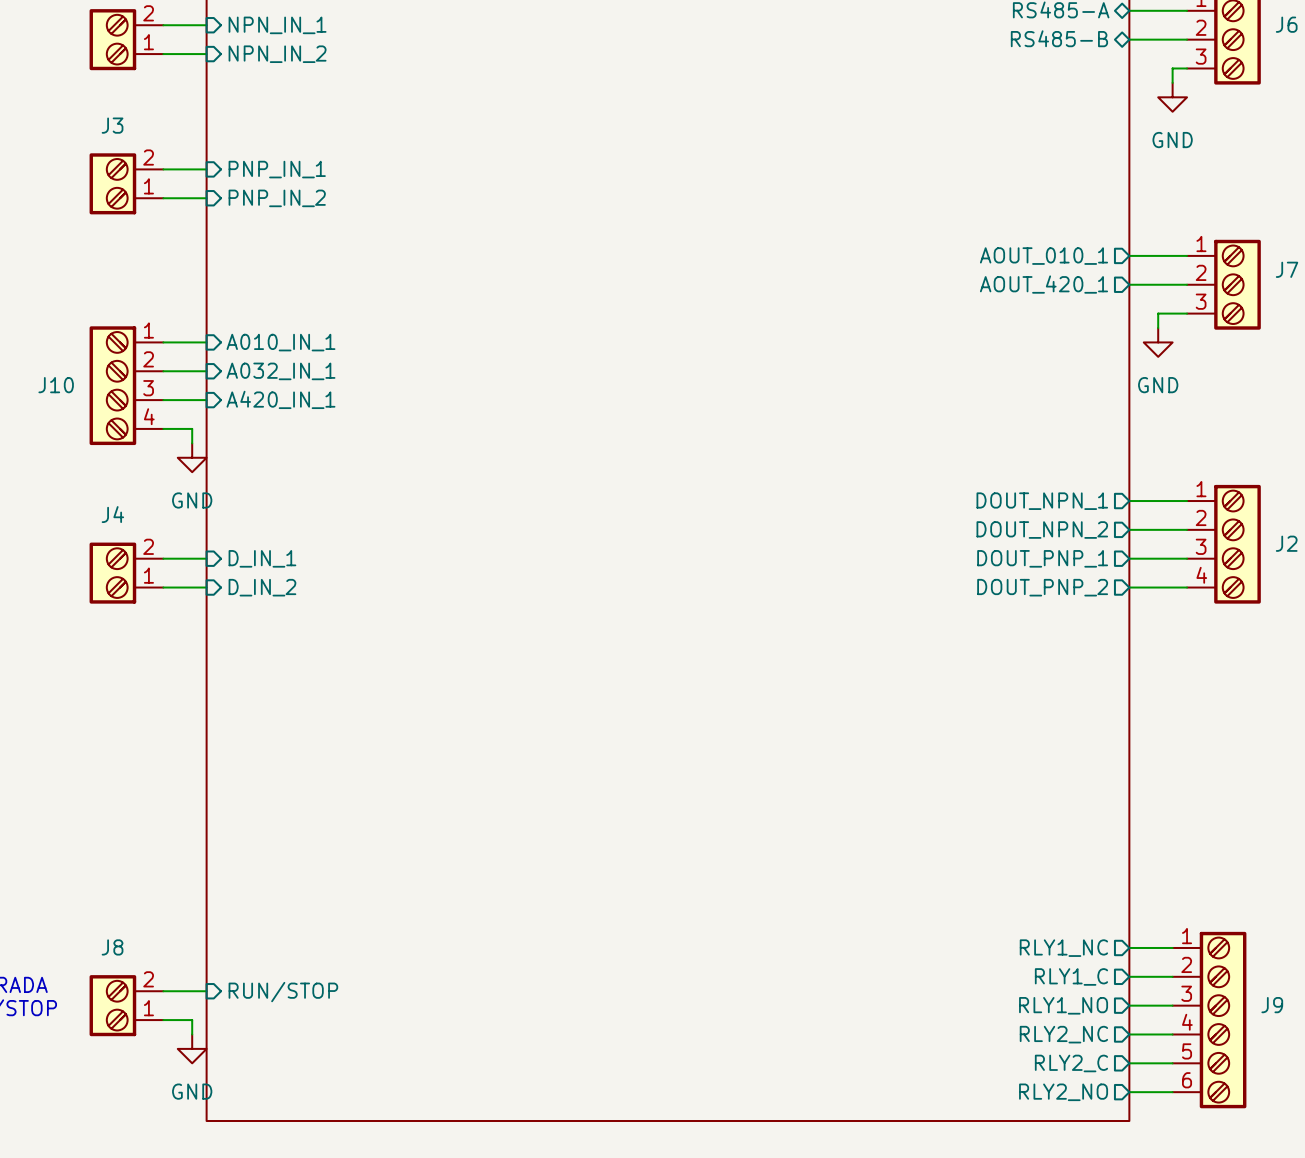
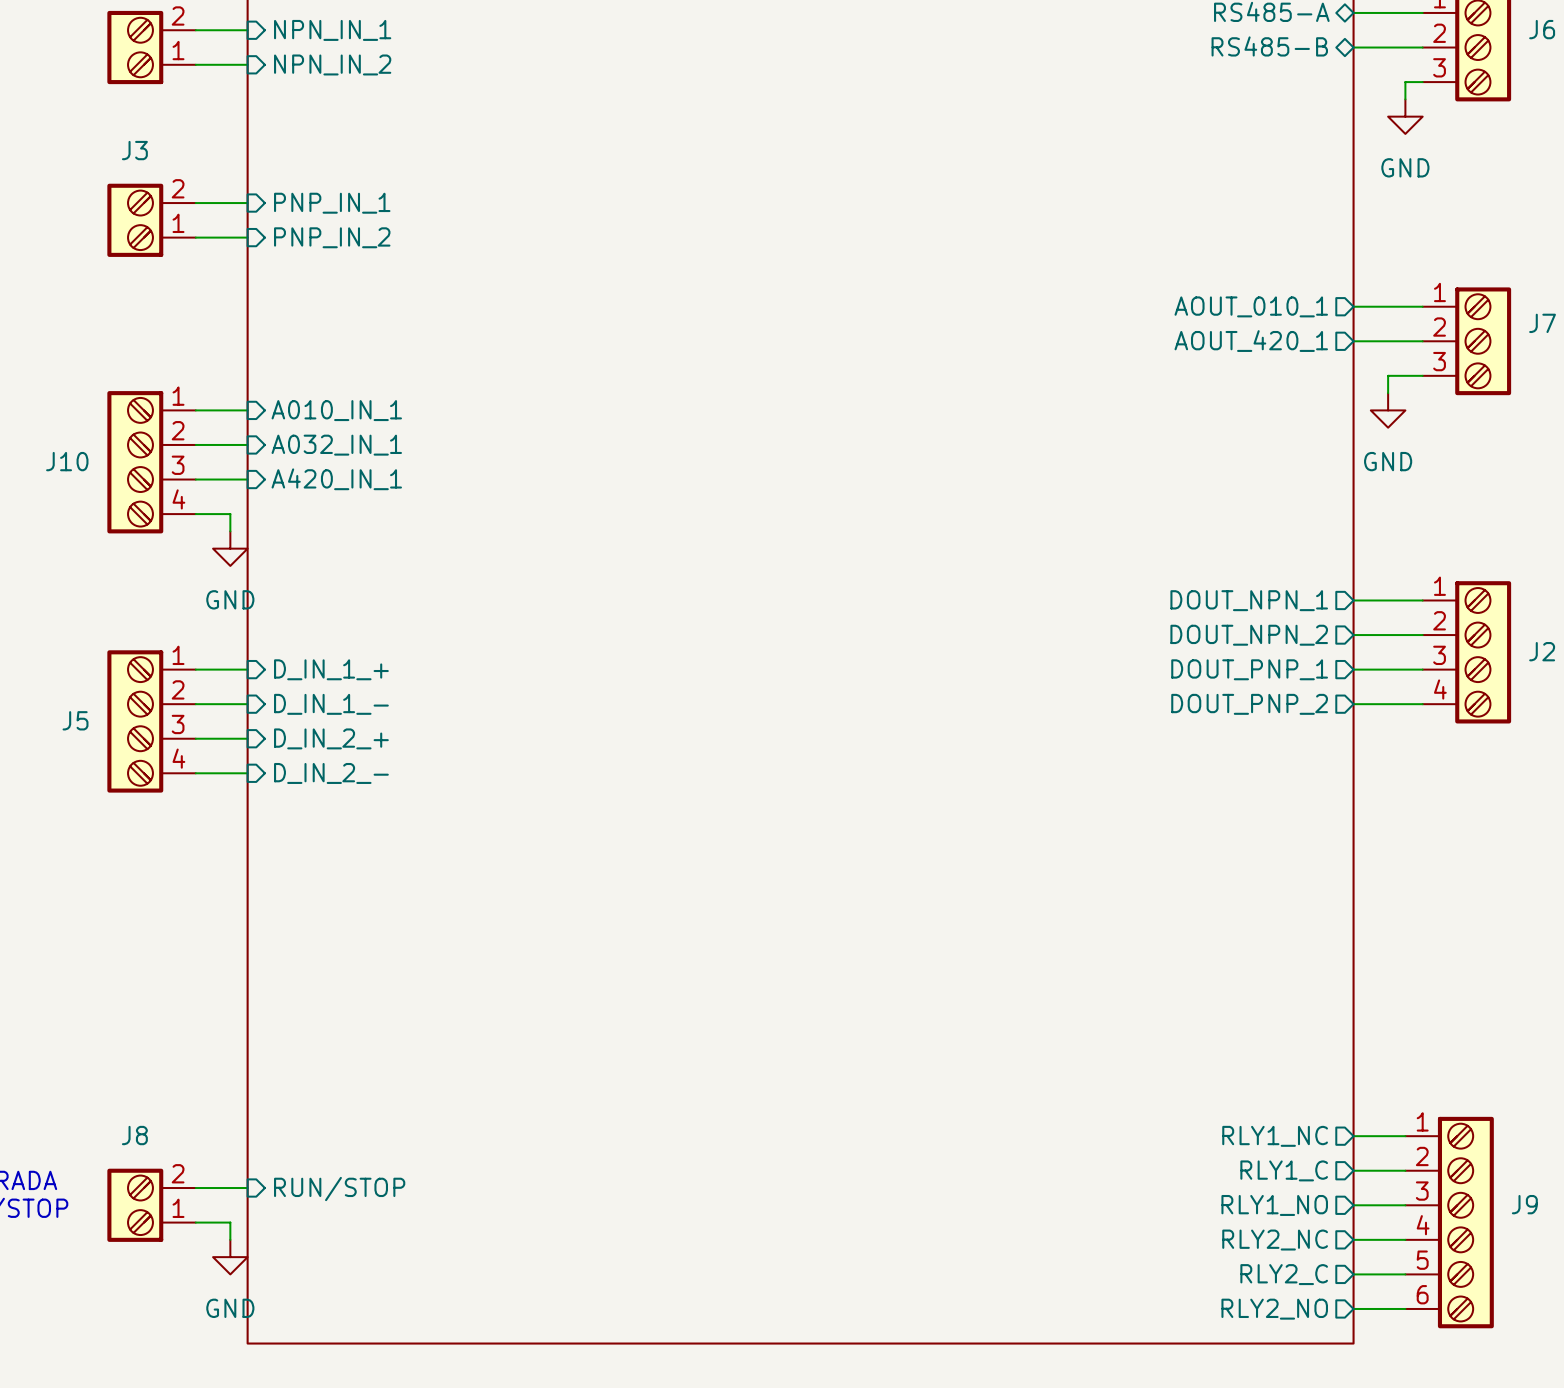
sheet pin: D_IN_1 (262, 558) -> D_IN_1_+ (331, 669)
J4: (126, 573) -> none
sheet pin: D_IN_2 (262, 587) -> D_IN_1_- (331, 704)
J5: none -> (151, 721)
wire: none -> (195, 738) (247, 738)
sheet pin: none -> D_IN_2_+ (331, 738)
wire: none -> (195, 773) (247, 773)
sheet pin: none -> D_IN_2_- (331, 773)

